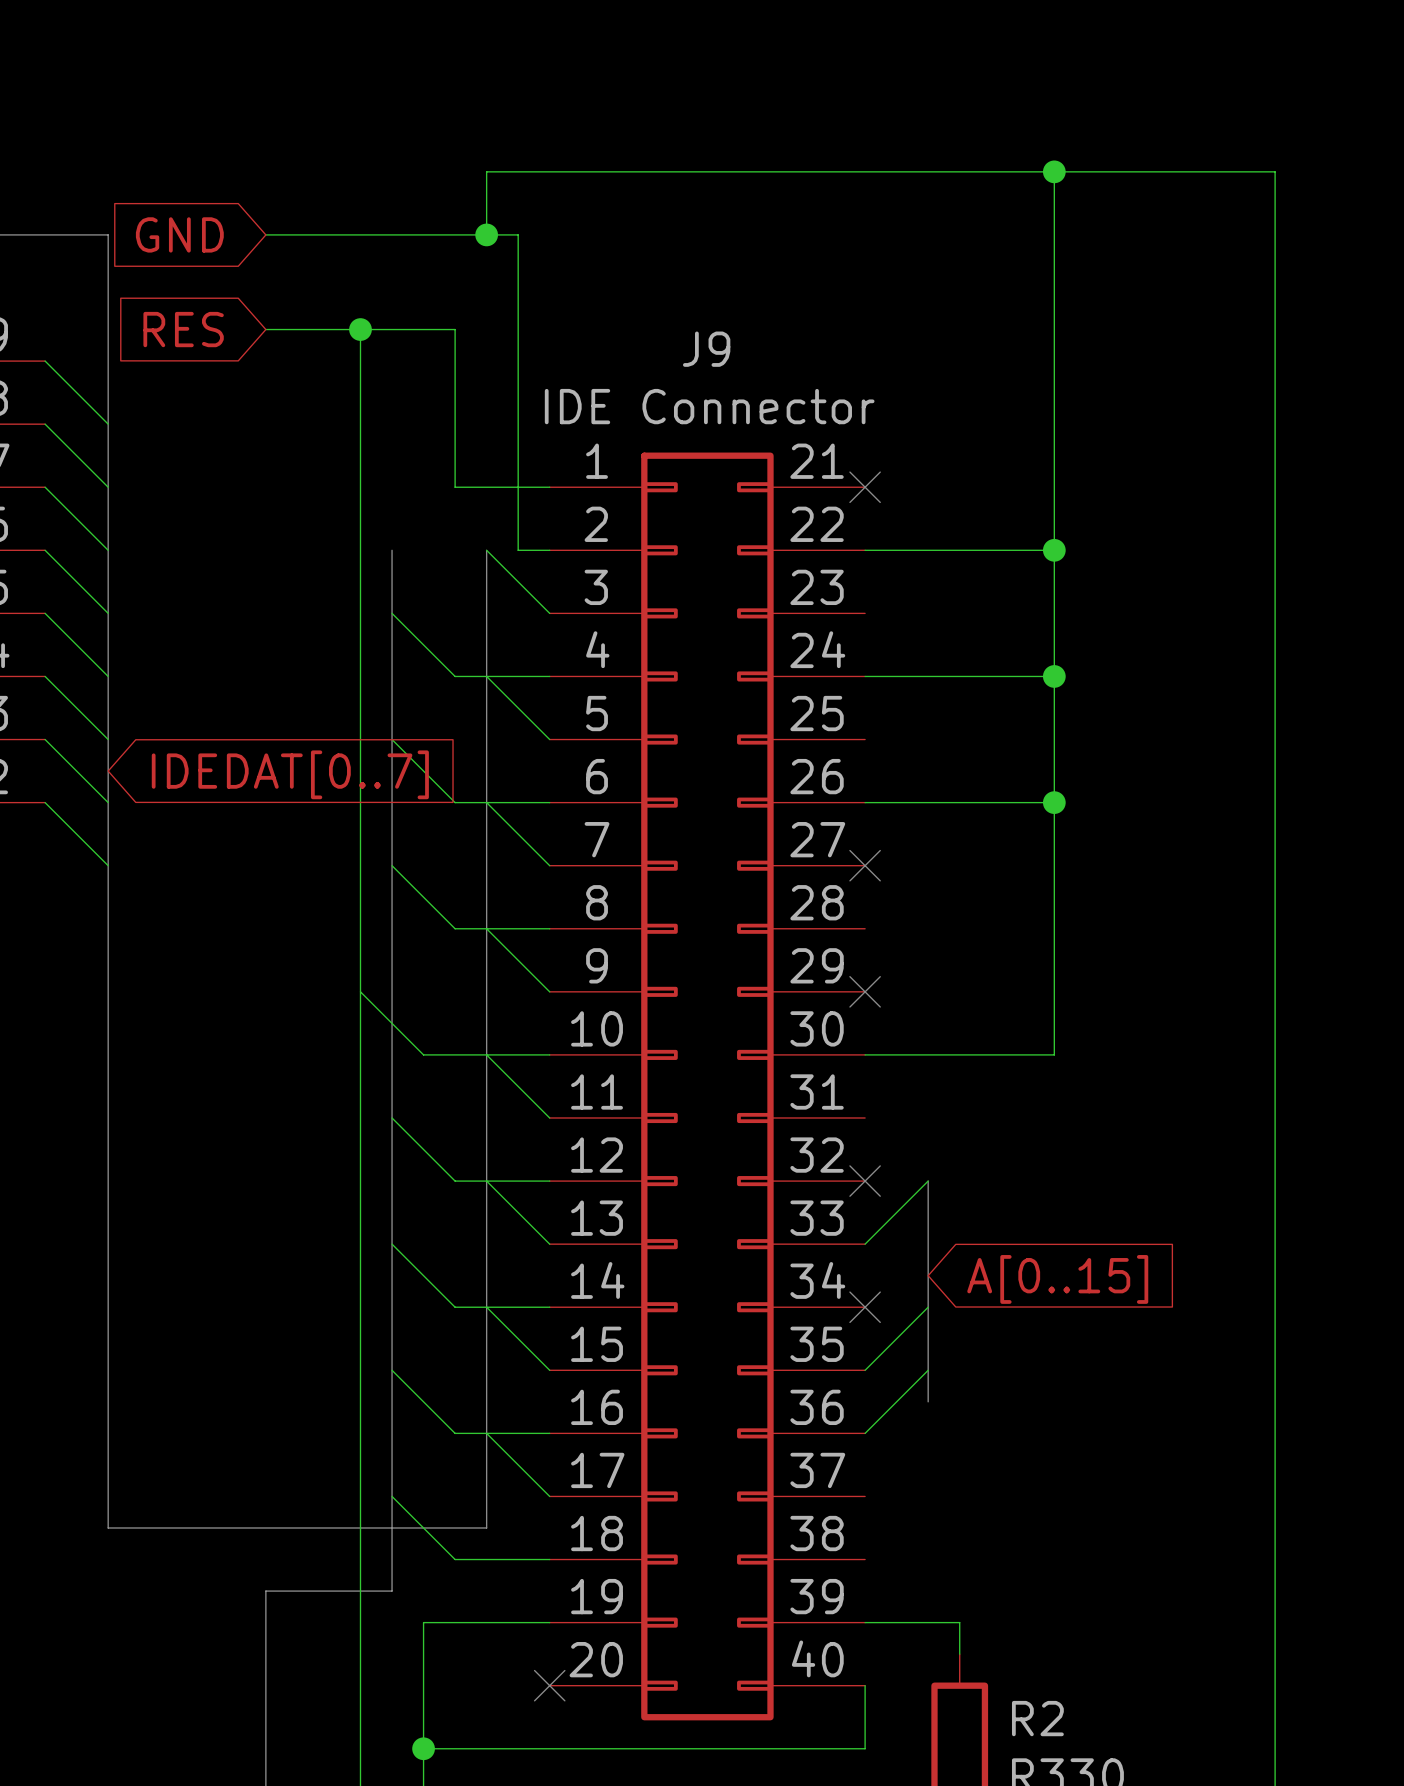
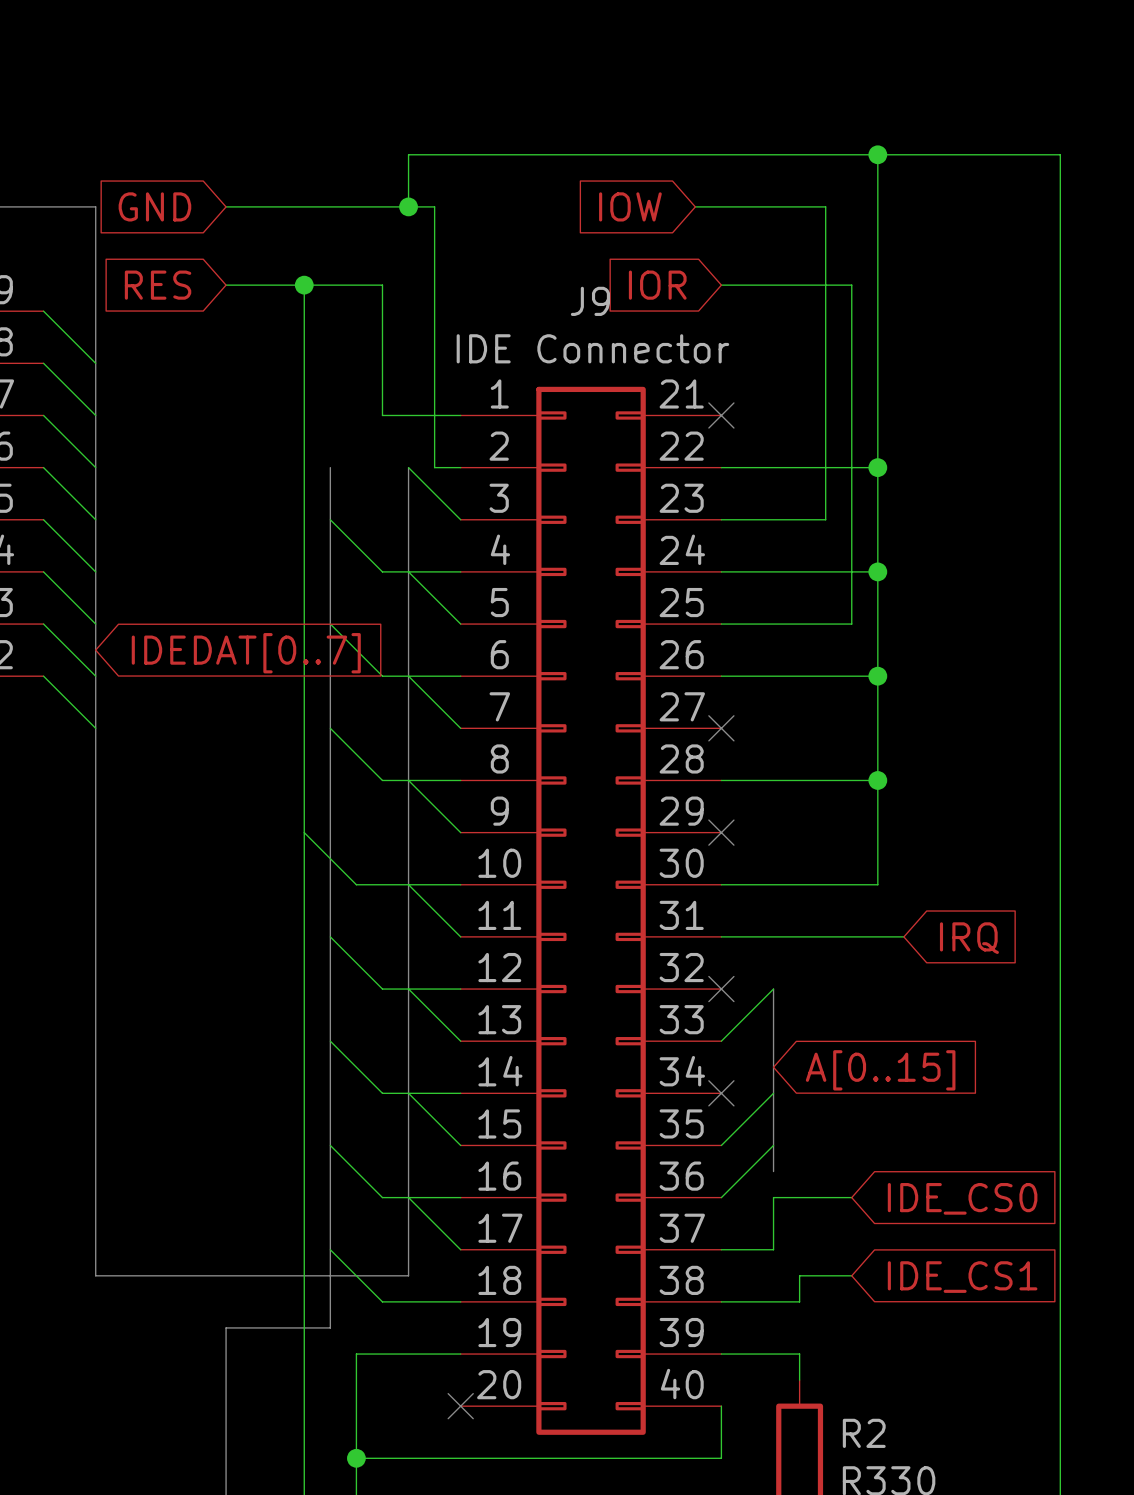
global label: none -> IOW (630, 206)
wire: none -> (695, 206) (825, 206) (825, 519) (721, 519)
global label: none -> IOR (657, 285)
wire: none -> (721, 285) (851, 285) (851, 624) (721, 624)
wire: none -> (721, 780) (877, 780)
junction: none -> (877, 780)
wire: none -> (721, 936) (903, 936)
global label: none -> IRQ (969, 938)
wire: none -> (851, 1197) (773, 1197) (773, 1249) (721, 1249)
global label: none -> IDE_CS0 (962, 1198)
wire: none -> (851, 1275) (799, 1275) (799, 1301) (721, 1301)
global label: none -> IDE_CS1 (962, 1277)

